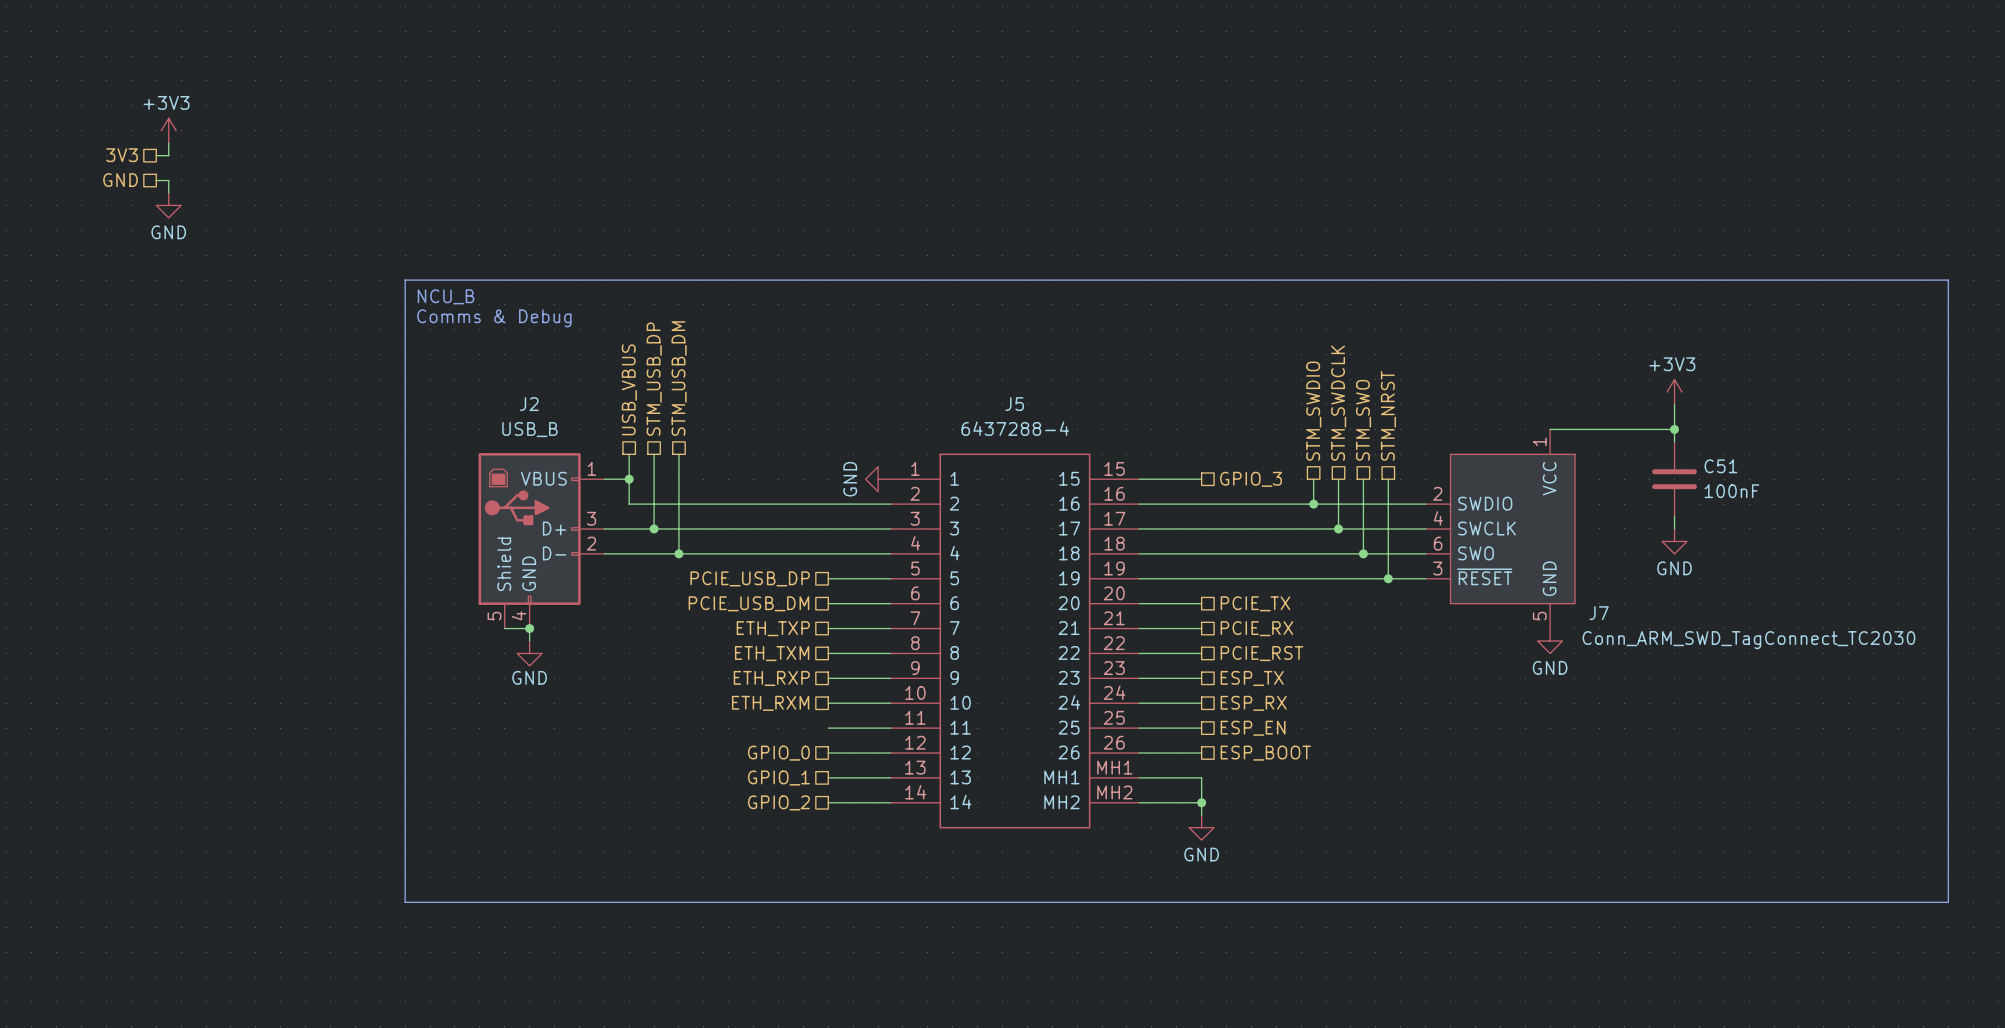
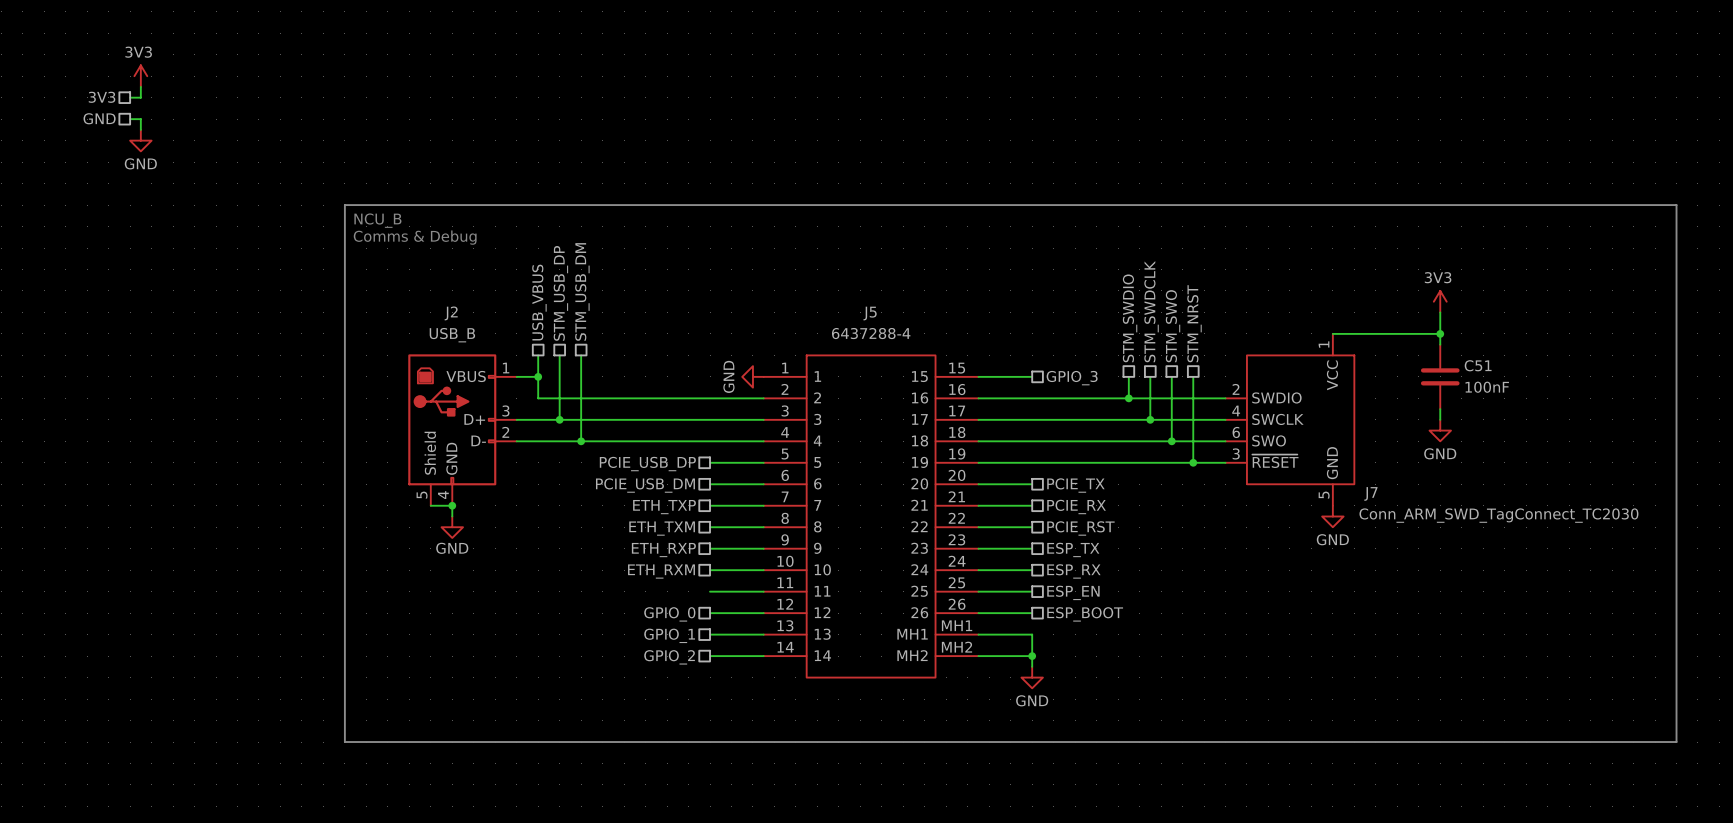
power symbol: +3V3 (168, 130) -> 3V3 (140, 76)
power symbol: +3V3 (1674, 392) -> 3V3 (1440, 301)

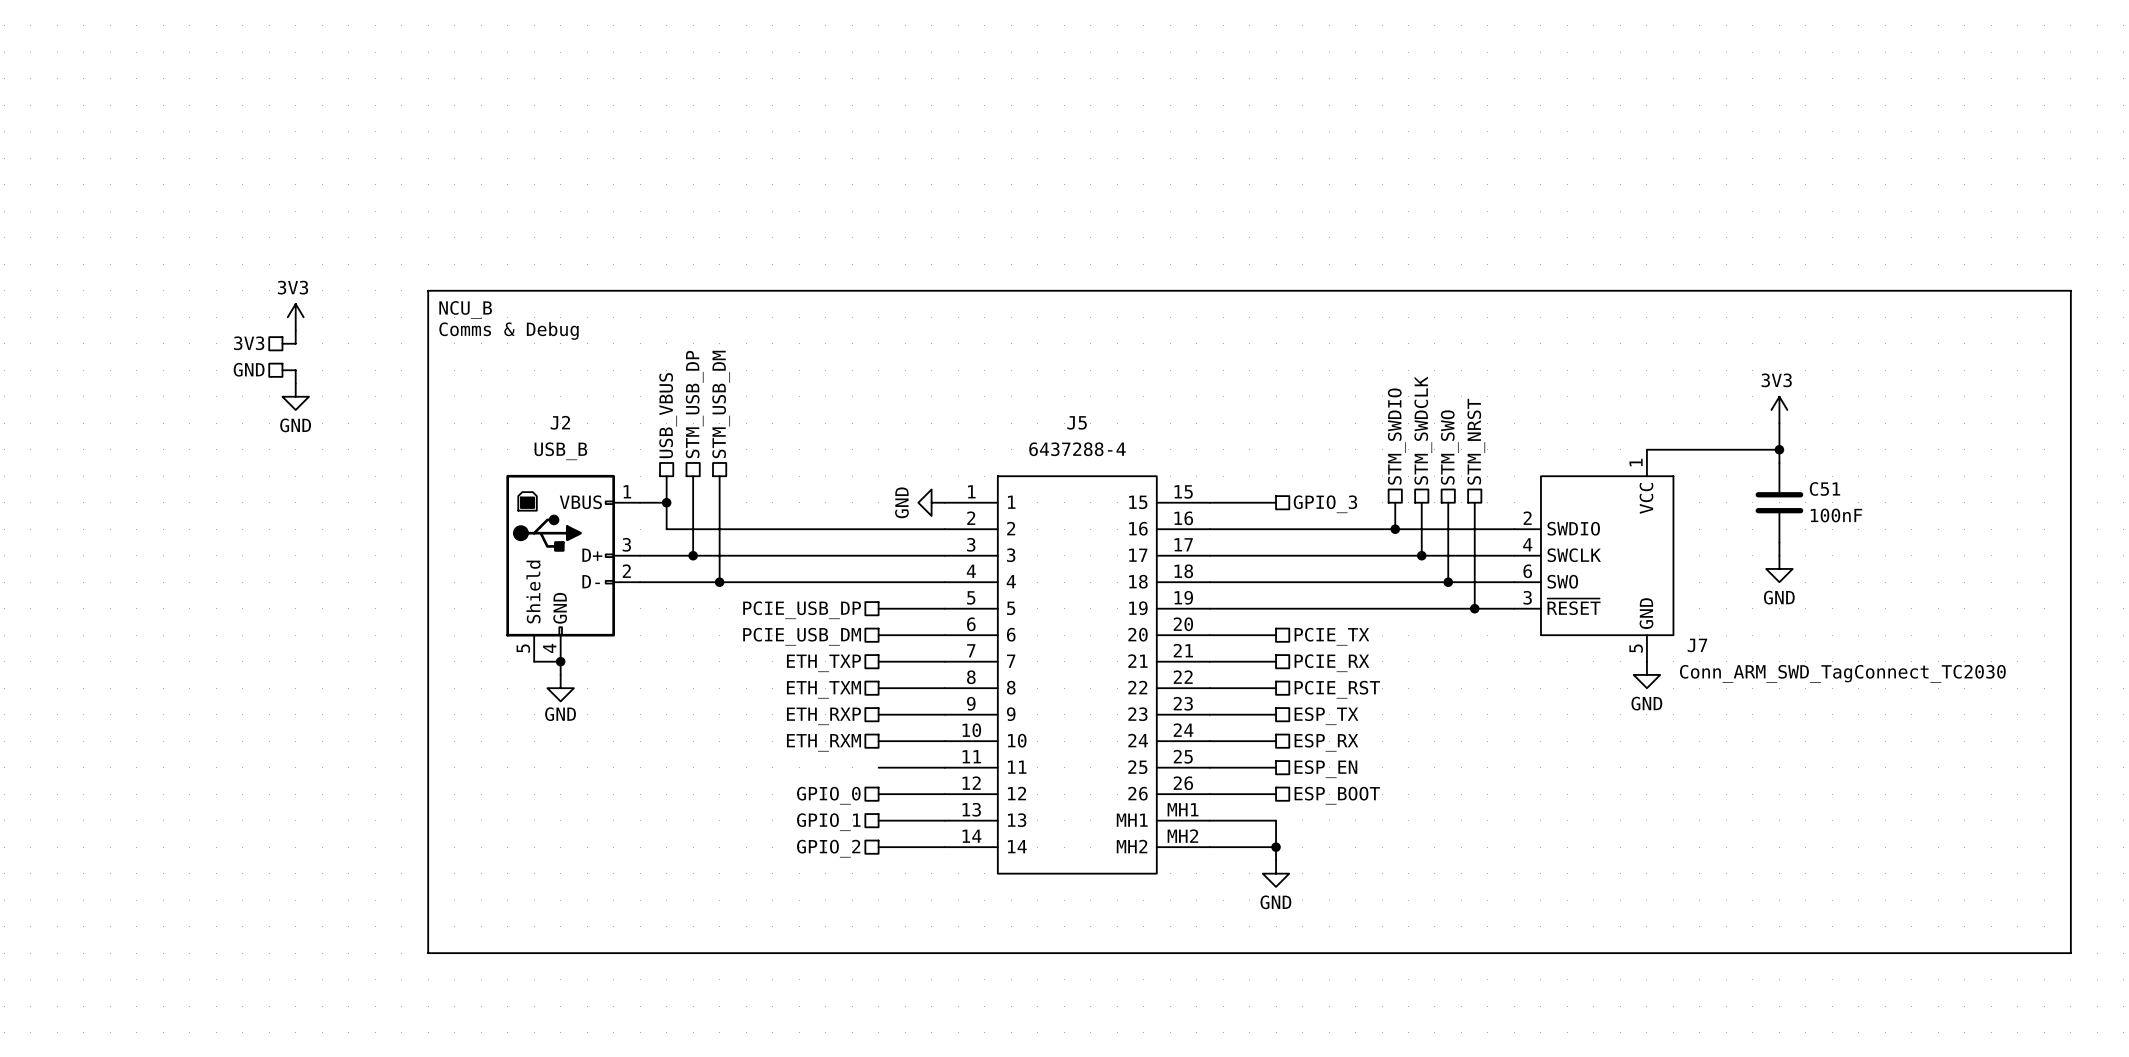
power symbol position: 3V3 (140, 76) -> 3V3 (295, 317)
wire: (140, 86) (140, 97) (130, 97) -> (295, 330) (295, 343) (282, 343)
hierarchical label position: 3V3 (102, 97) -> 3V3 (249, 343)
hierarchical label position: GND (99, 118) -> GND (249, 369)
wire: (130, 119) (140, 119) (140, 129) -> (282, 370) (295, 370) (295, 383)
power symbol position: GND (140, 140) -> GND (295, 396)

